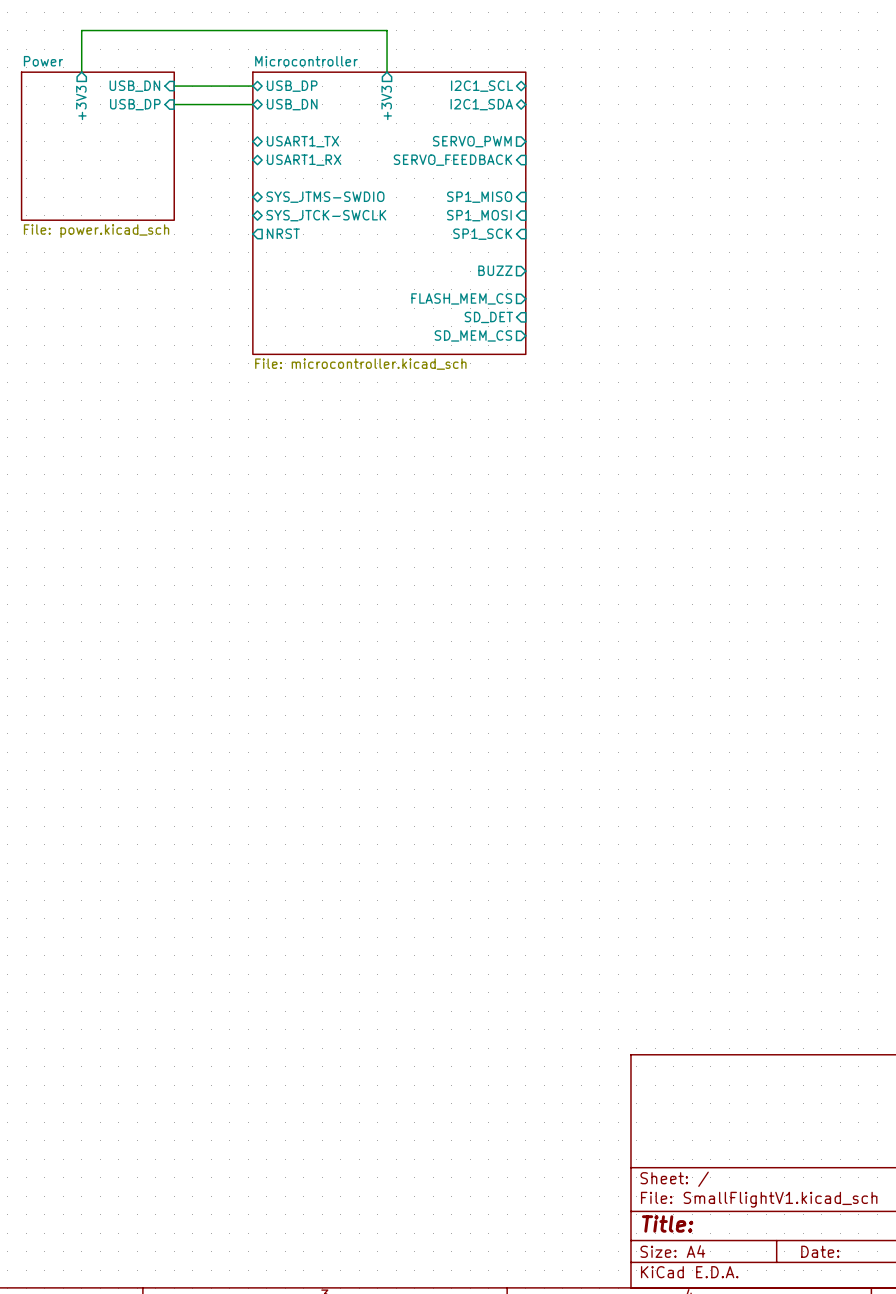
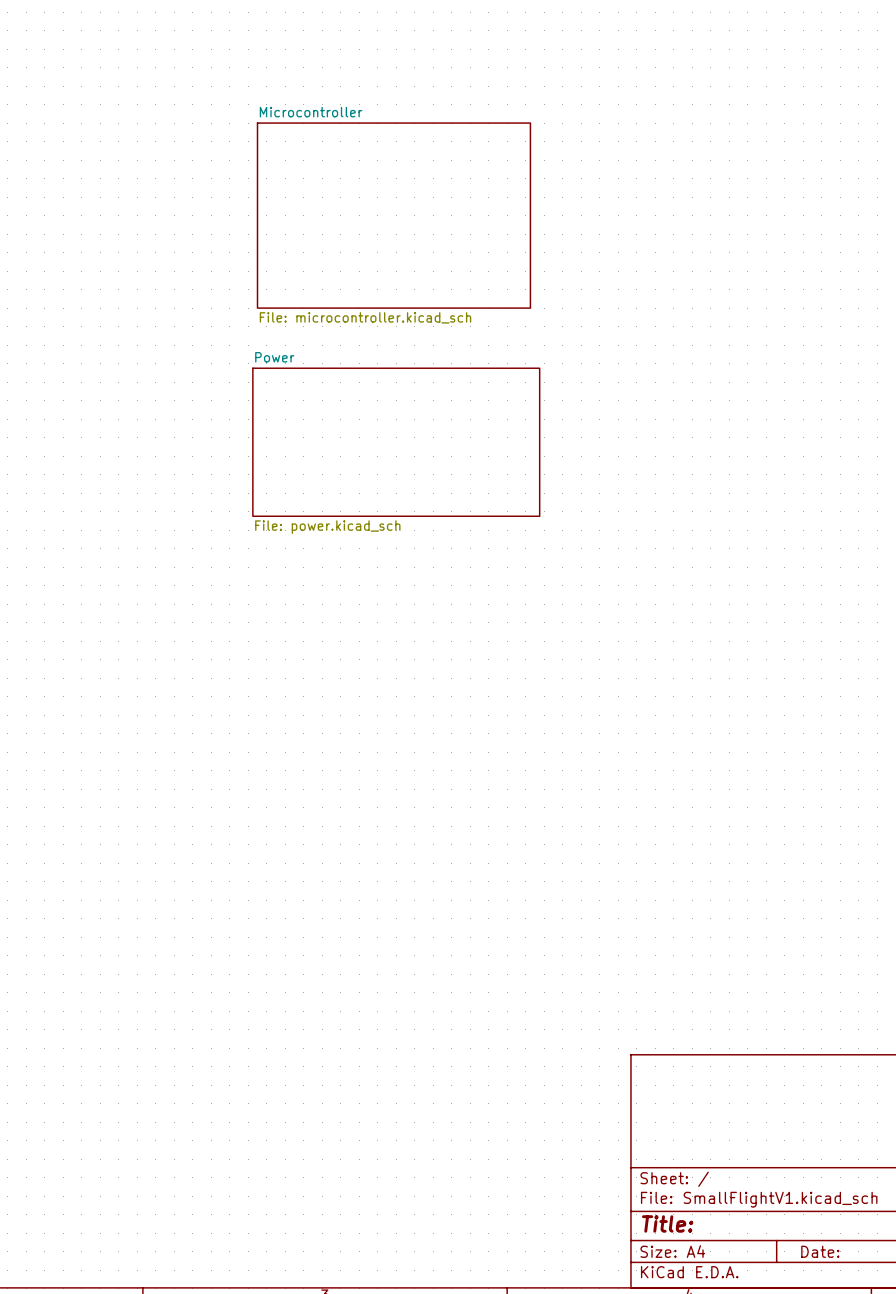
sheet Microcontroller name position: Microcontroller (306, 61) -> Microcontroller (311, 112)
sheet Microcontroller shape: [252, 71, 527, 355] -> [256, 122, 531, 309]
wire: (81, 72) (81, 30) (387, 30) (387, 72) -> none
sheet pin: USB_DN (134, 86) -> none
wire: (174, 86) (252, 86) -> none
sheet pin: USB_DP (292, 86) -> none
sheet pin: I2C1_SCL (482, 86) -> none
sheet pin: +3V3 (81, 102) -> none
sheet pin: +3V3 (386, 102) -> none
sheet pin: USB_DP (135, 104) -> none
wire: (174, 104) (252, 104) -> none
sheet pin: USB_DN (292, 104) -> none
sheet pin: I2C1_SDA (481, 104) -> none
sheet pin: USART1_TX (303, 141) -> none
sheet pin: SERVO_PWM (472, 141) -> none
sheet Power: File: power.kicad_sch (97, 146) -> none
sheet pin: USART1_RX (304, 160) -> none
sheet pin: SERVO_FEEDBACK (452, 160) -> none
sheet pin: SYS_JTMS-SWDIO (325, 197) -> none
sheet pin: SP1_MISO (479, 197) -> none
sheet pin: SYS_JTCK-SWCLK (326, 215) -> none
sheet pin: SP1_MOSI (479, 215) -> none
sheet pin: NRST (283, 233) -> none
sheet pin: SP1_SCK (482, 234) -> none
sheet pin: BUZZ (495, 270) -> none
sheet pin: FLASH_MEM_CS (461, 298) -> none
sheet pin: SD_DET (488, 317) -> none
sheet pin: SD_MEM_CS (473, 335) -> none
sheet Microcontroller value position: File: microcontroller.kicad_sch (360, 364) -> File: microcontroller.kicad_sch (365, 317)
sheet Power: none -> File: power.kicad_sch (396, 442)

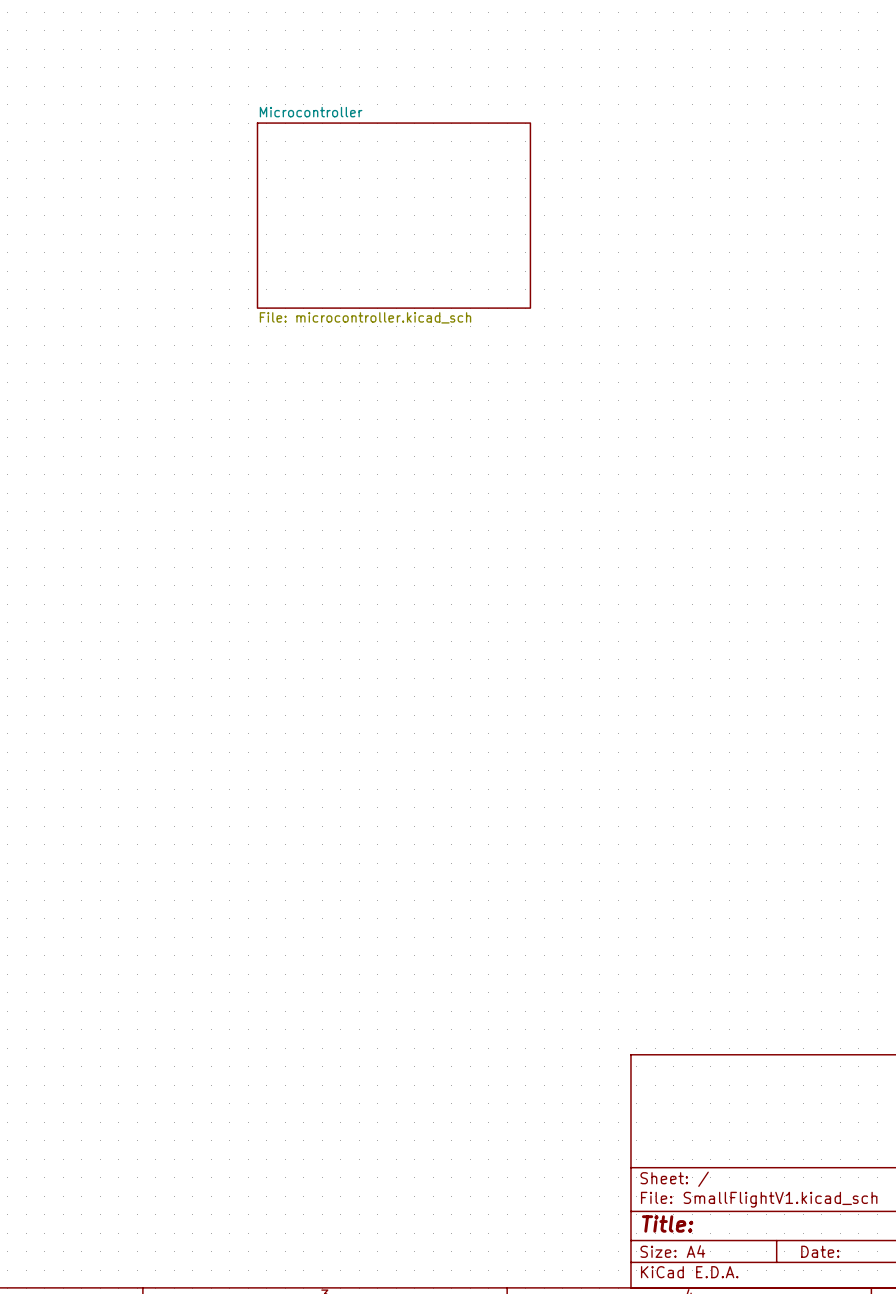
sheet Power: File: power.kicad_sch (396, 442) -> none

